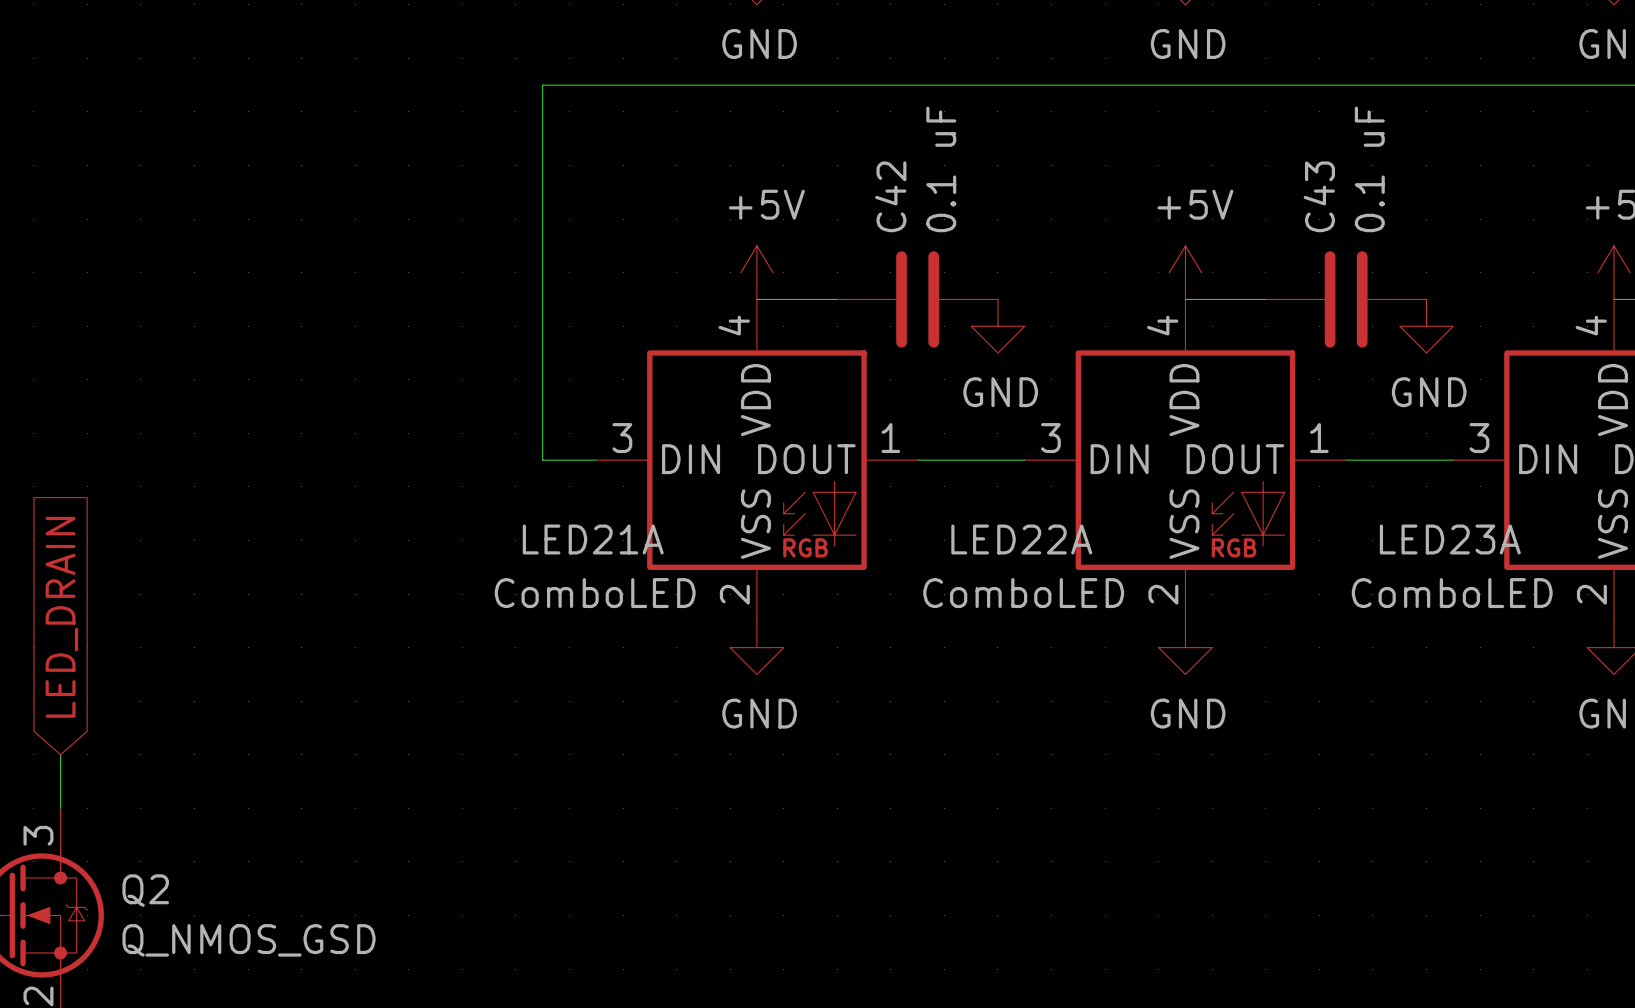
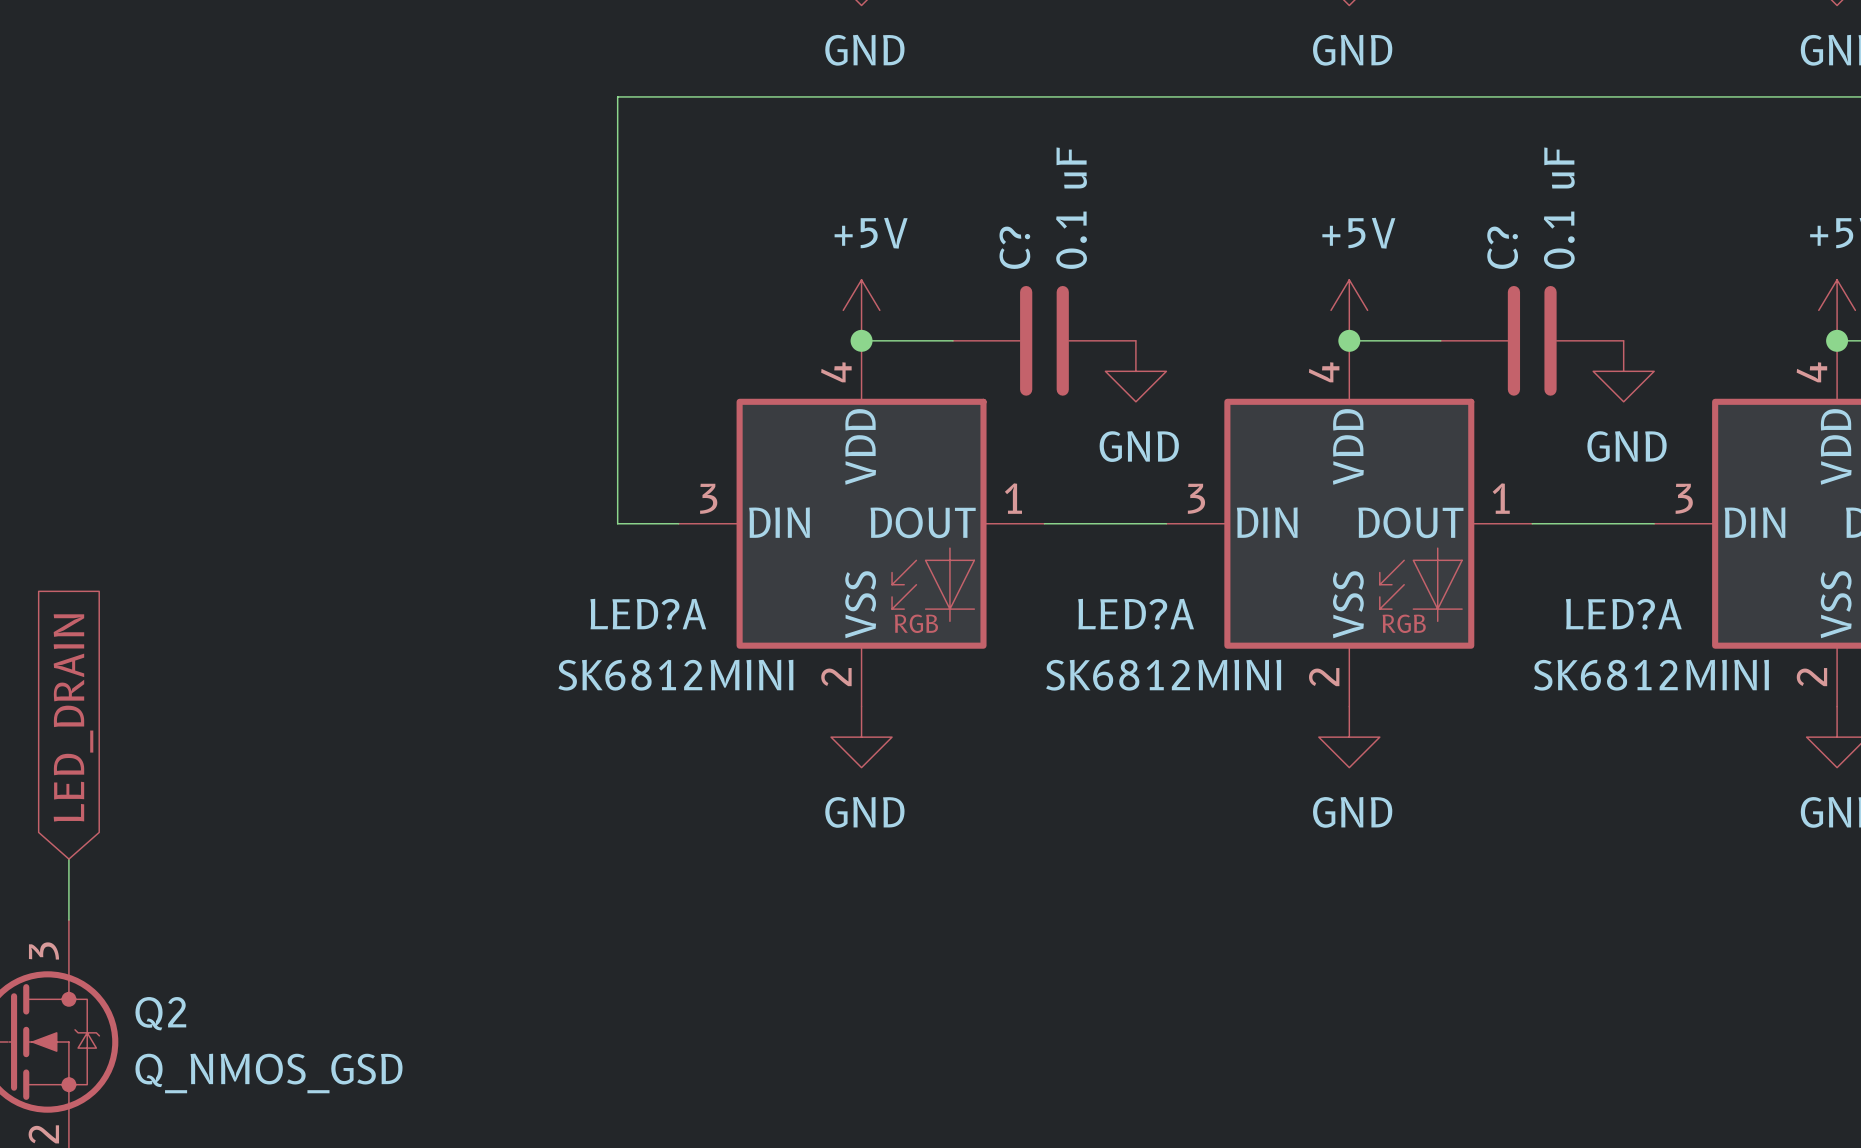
C42 name: C42 (890, 196) -> C? (1014, 247)
C43 name: C43 (1319, 196) -> C? (1502, 247)
junction: none -> (861, 340)
junction: none -> (1349, 340)
junction: none -> (1837, 340)
LED21A name: LED21A (593, 539) -> LED?A (648, 614)
LED22A name: LED22A (1021, 539) -> LED?A (1136, 614)
LED23A name: LED23A (1450, 539) -> LED?A (1623, 614)
LED21A value: ComboLED (595, 593) -> SK6812MINI (675, 675)
LED22A value: ComboLED (1023, 593) -> SK6812MINI (1163, 675)
LED23A value: ComboLED (1452, 593) -> SK6812MINI (1651, 675)

